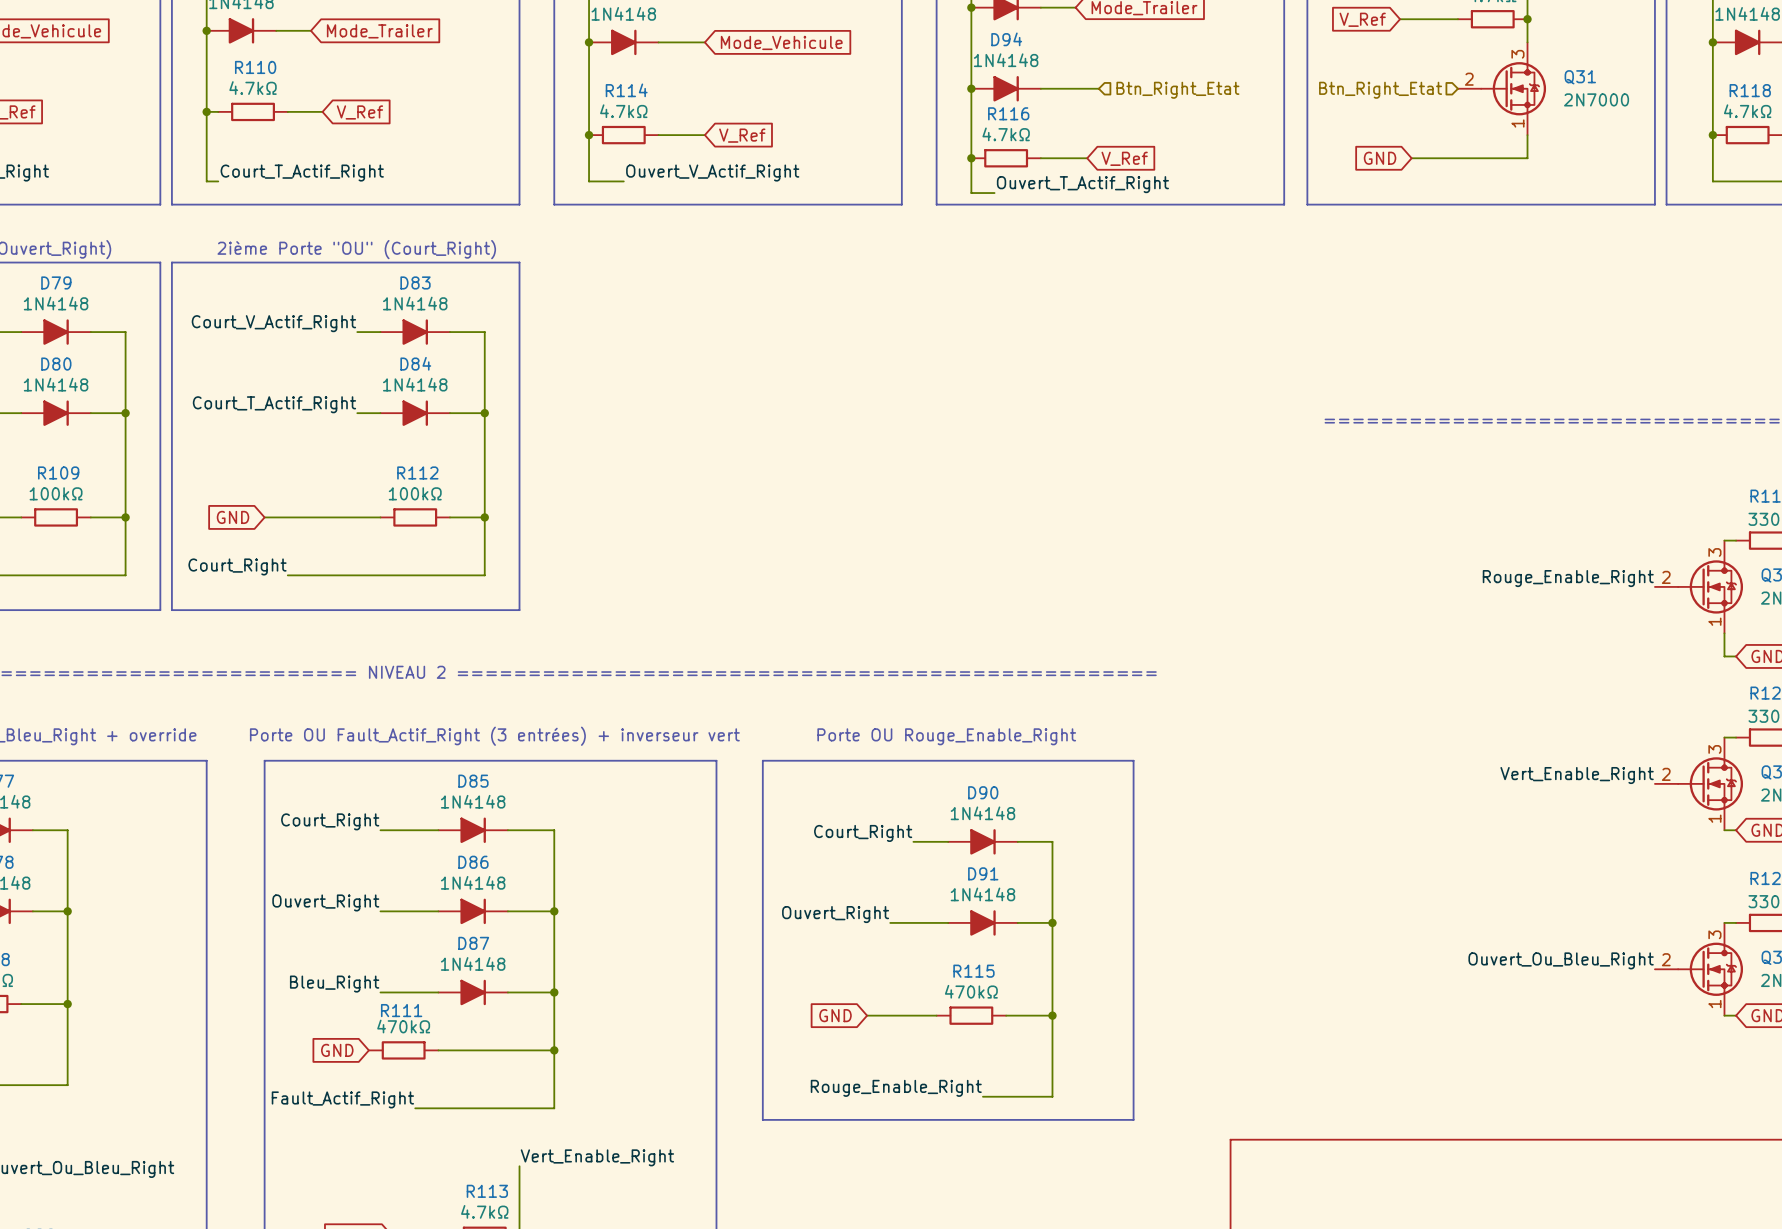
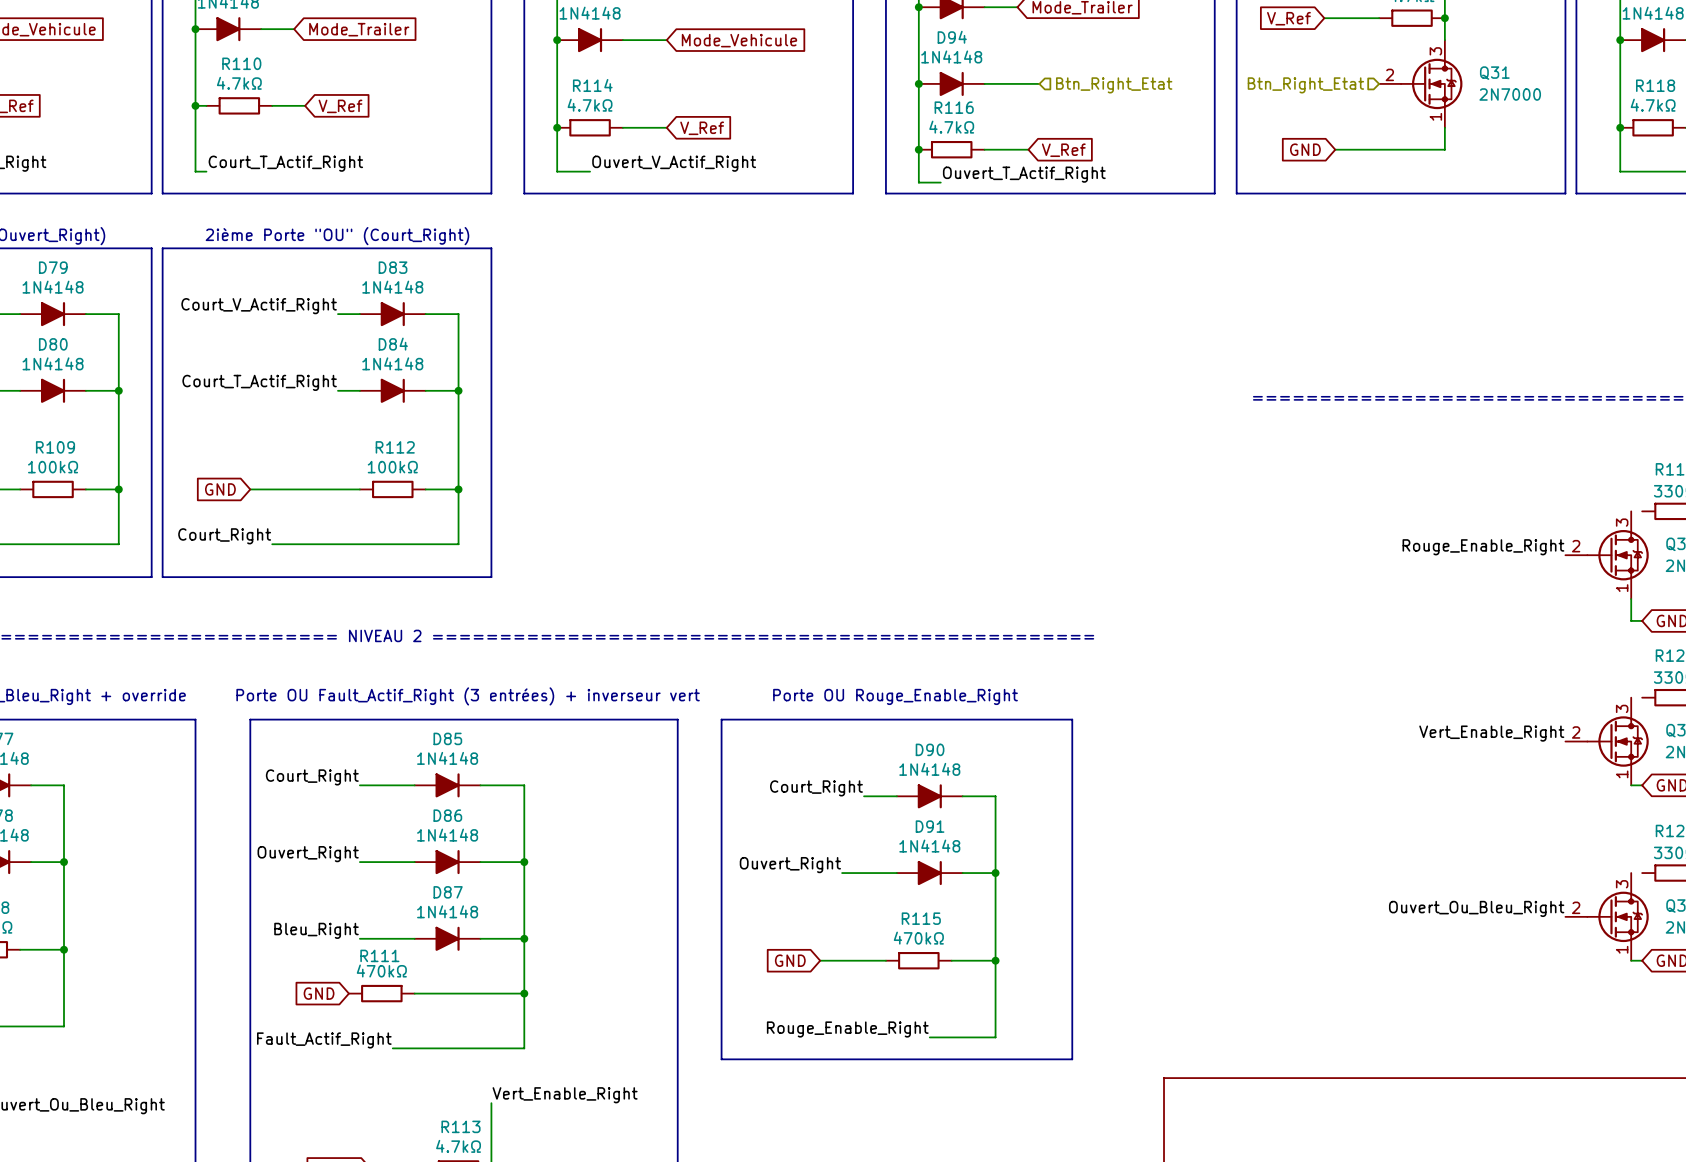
wire: (1724, 540) (1736, 540) -> none
wire: (1724, 737) (1736, 737) -> none
wire: (1724, 922) (1736, 922) -> none

